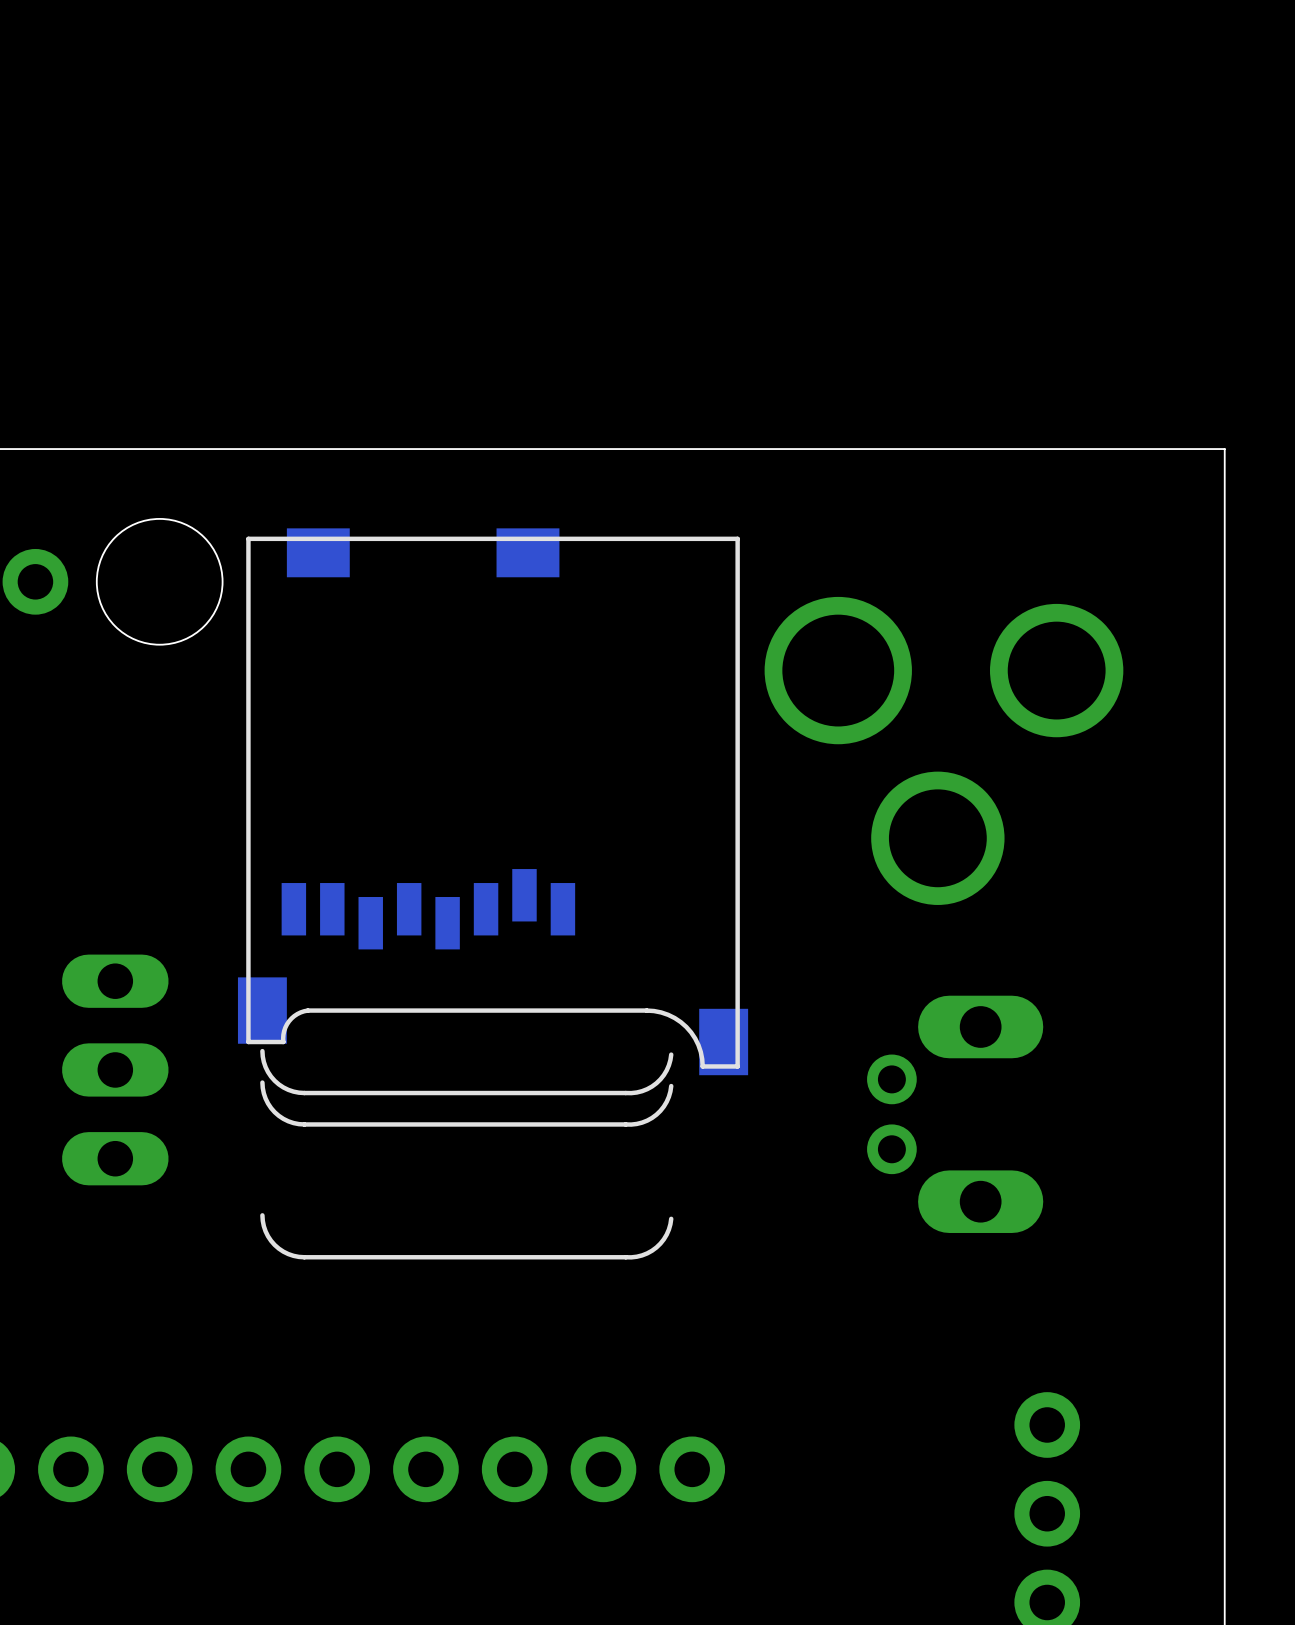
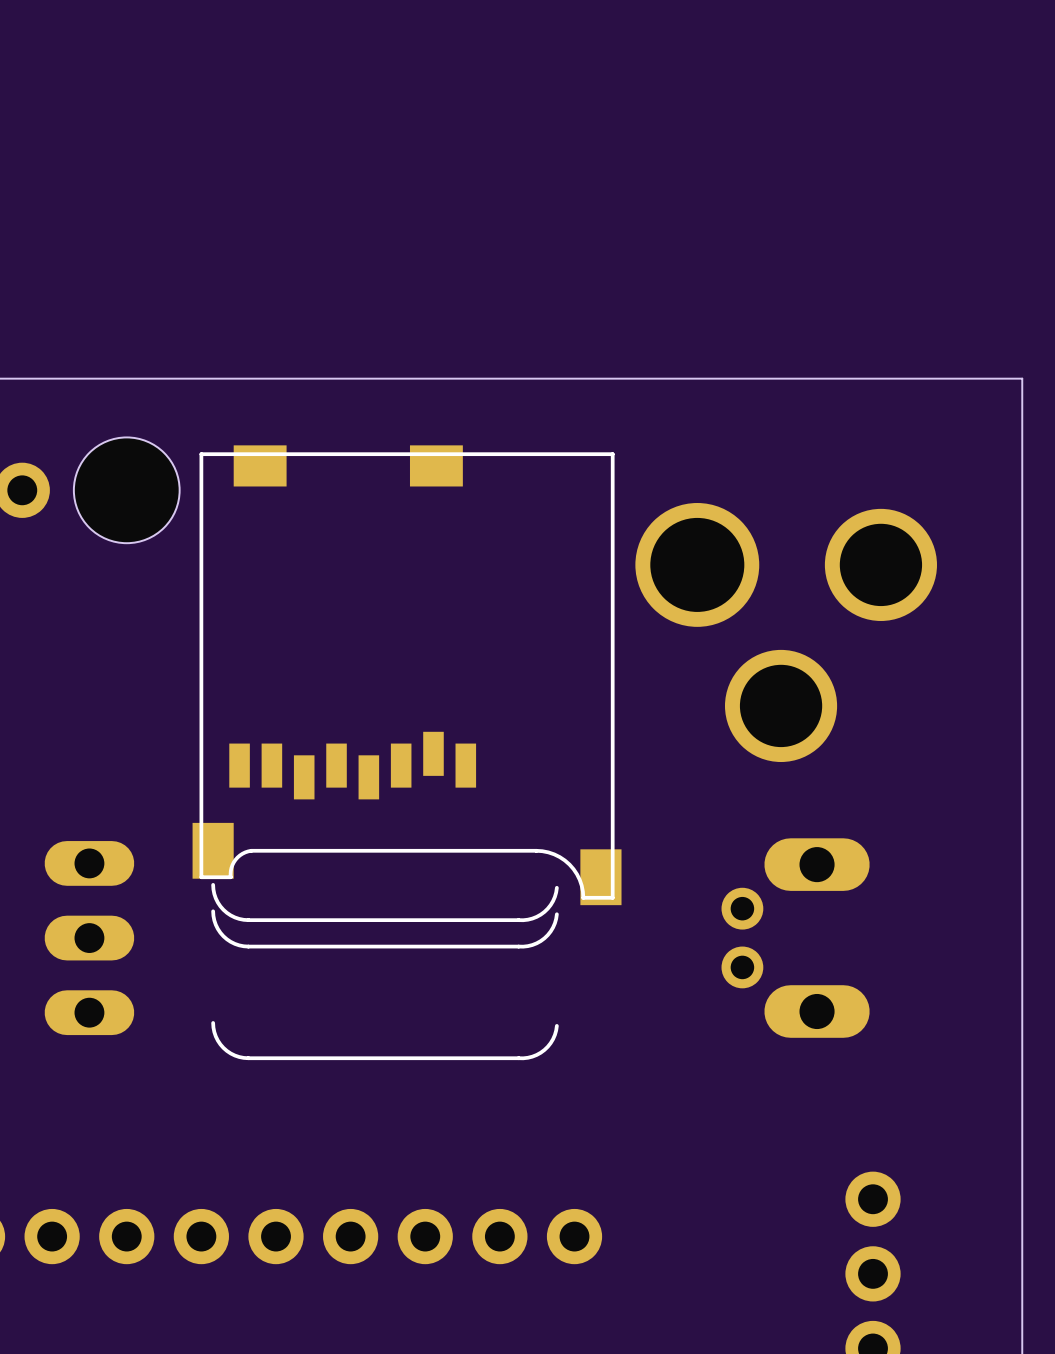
part position: (115, 1069) -> (89, 938)

